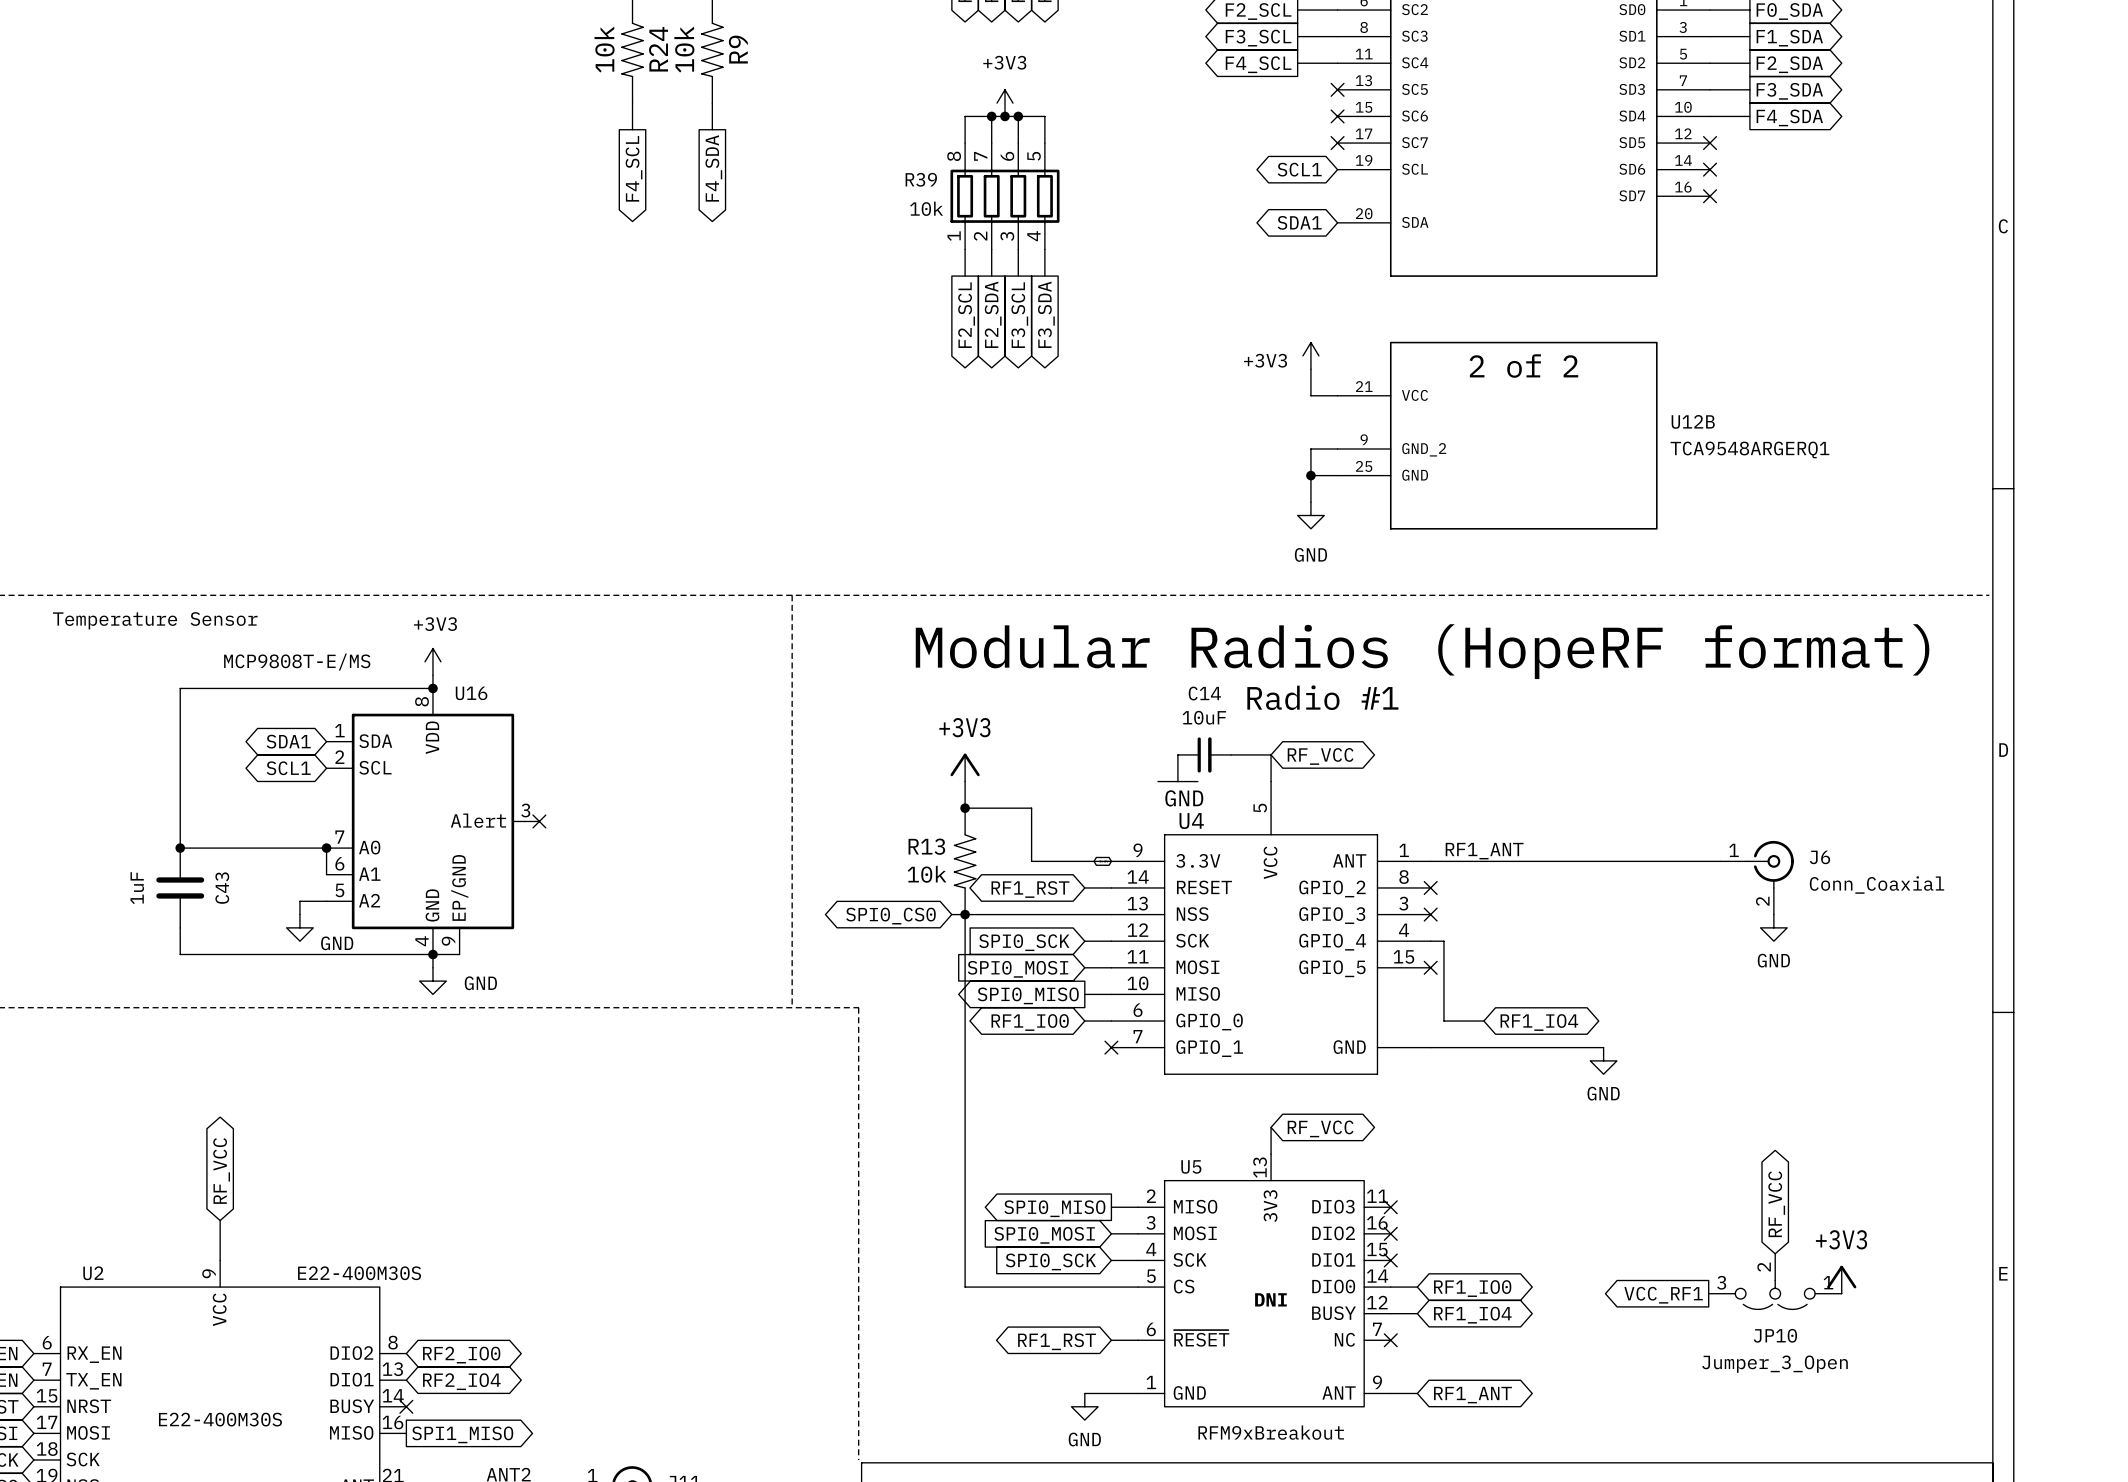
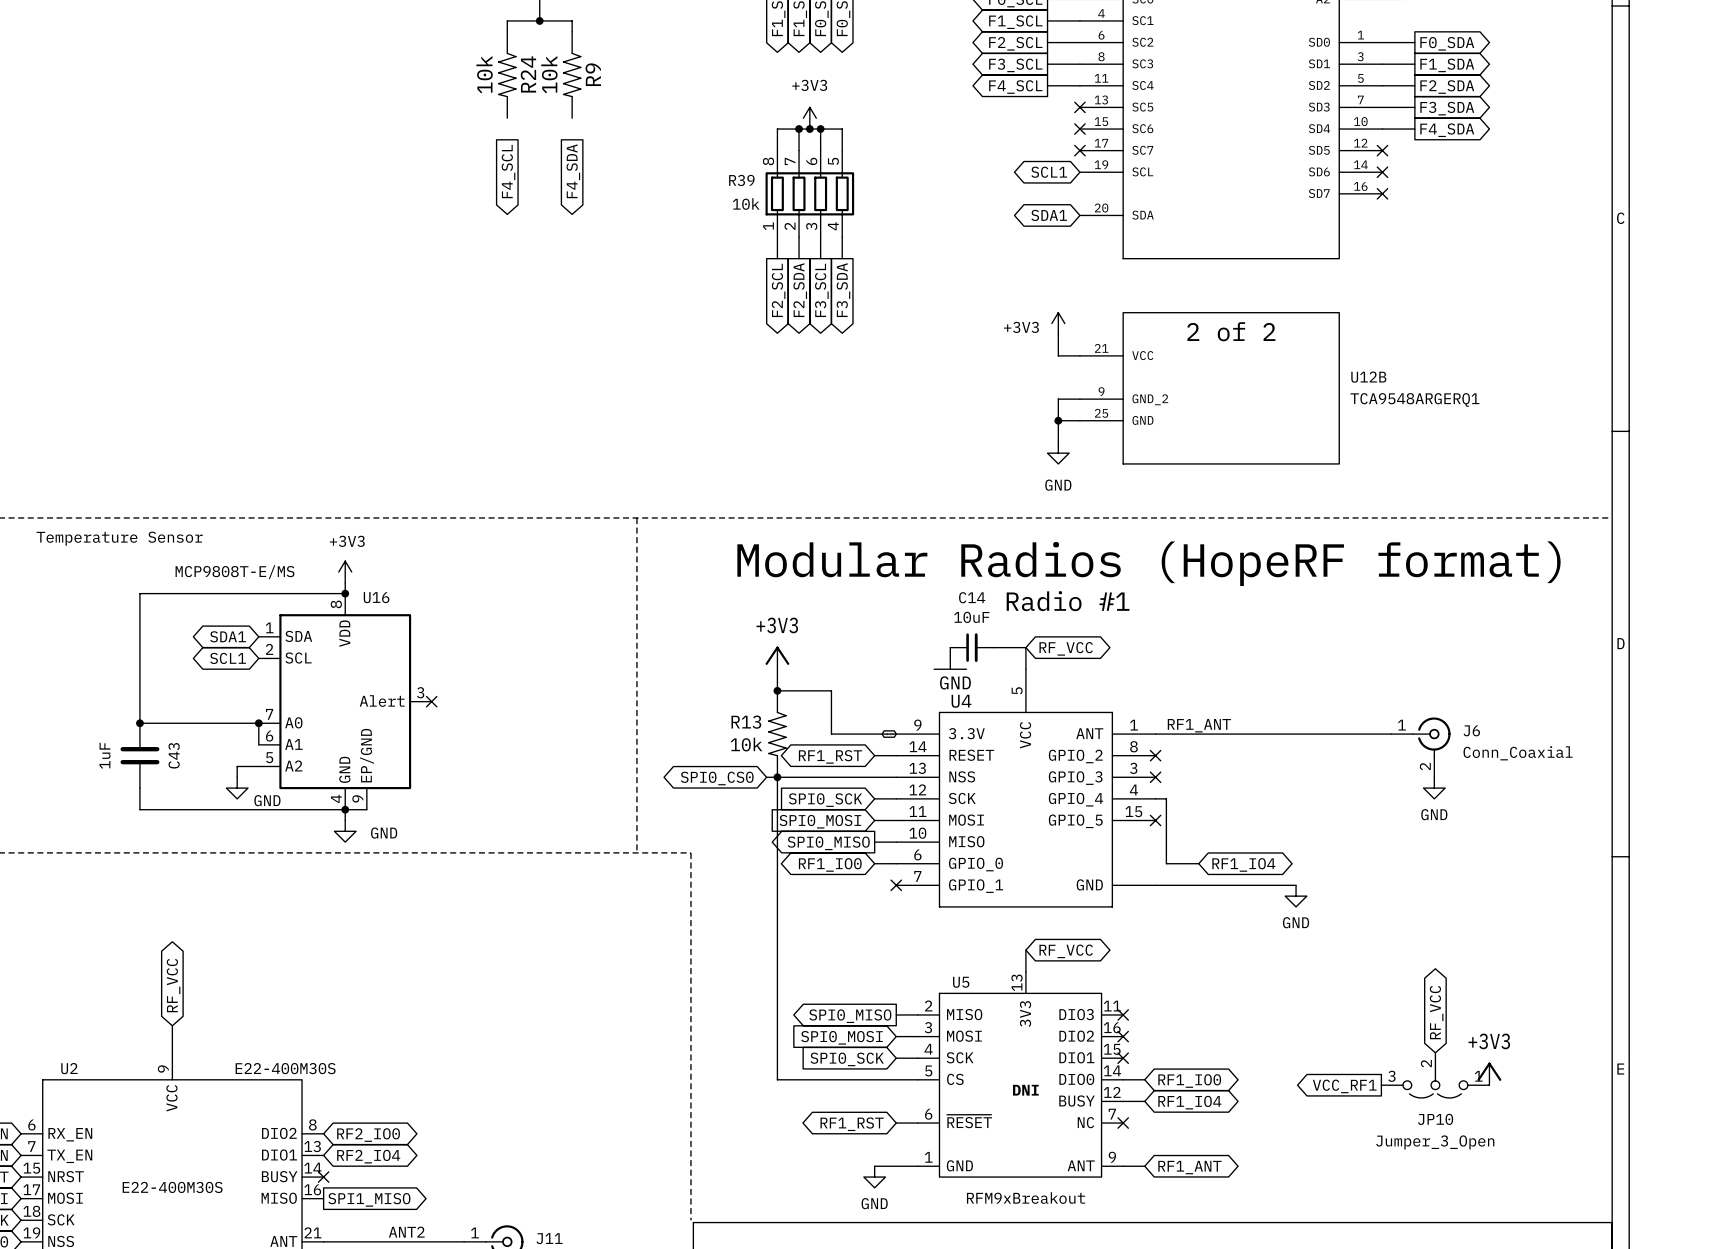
wire: (632, 103) (632, 129) -> none
wire: (712, 103) (712, 129) -> none

